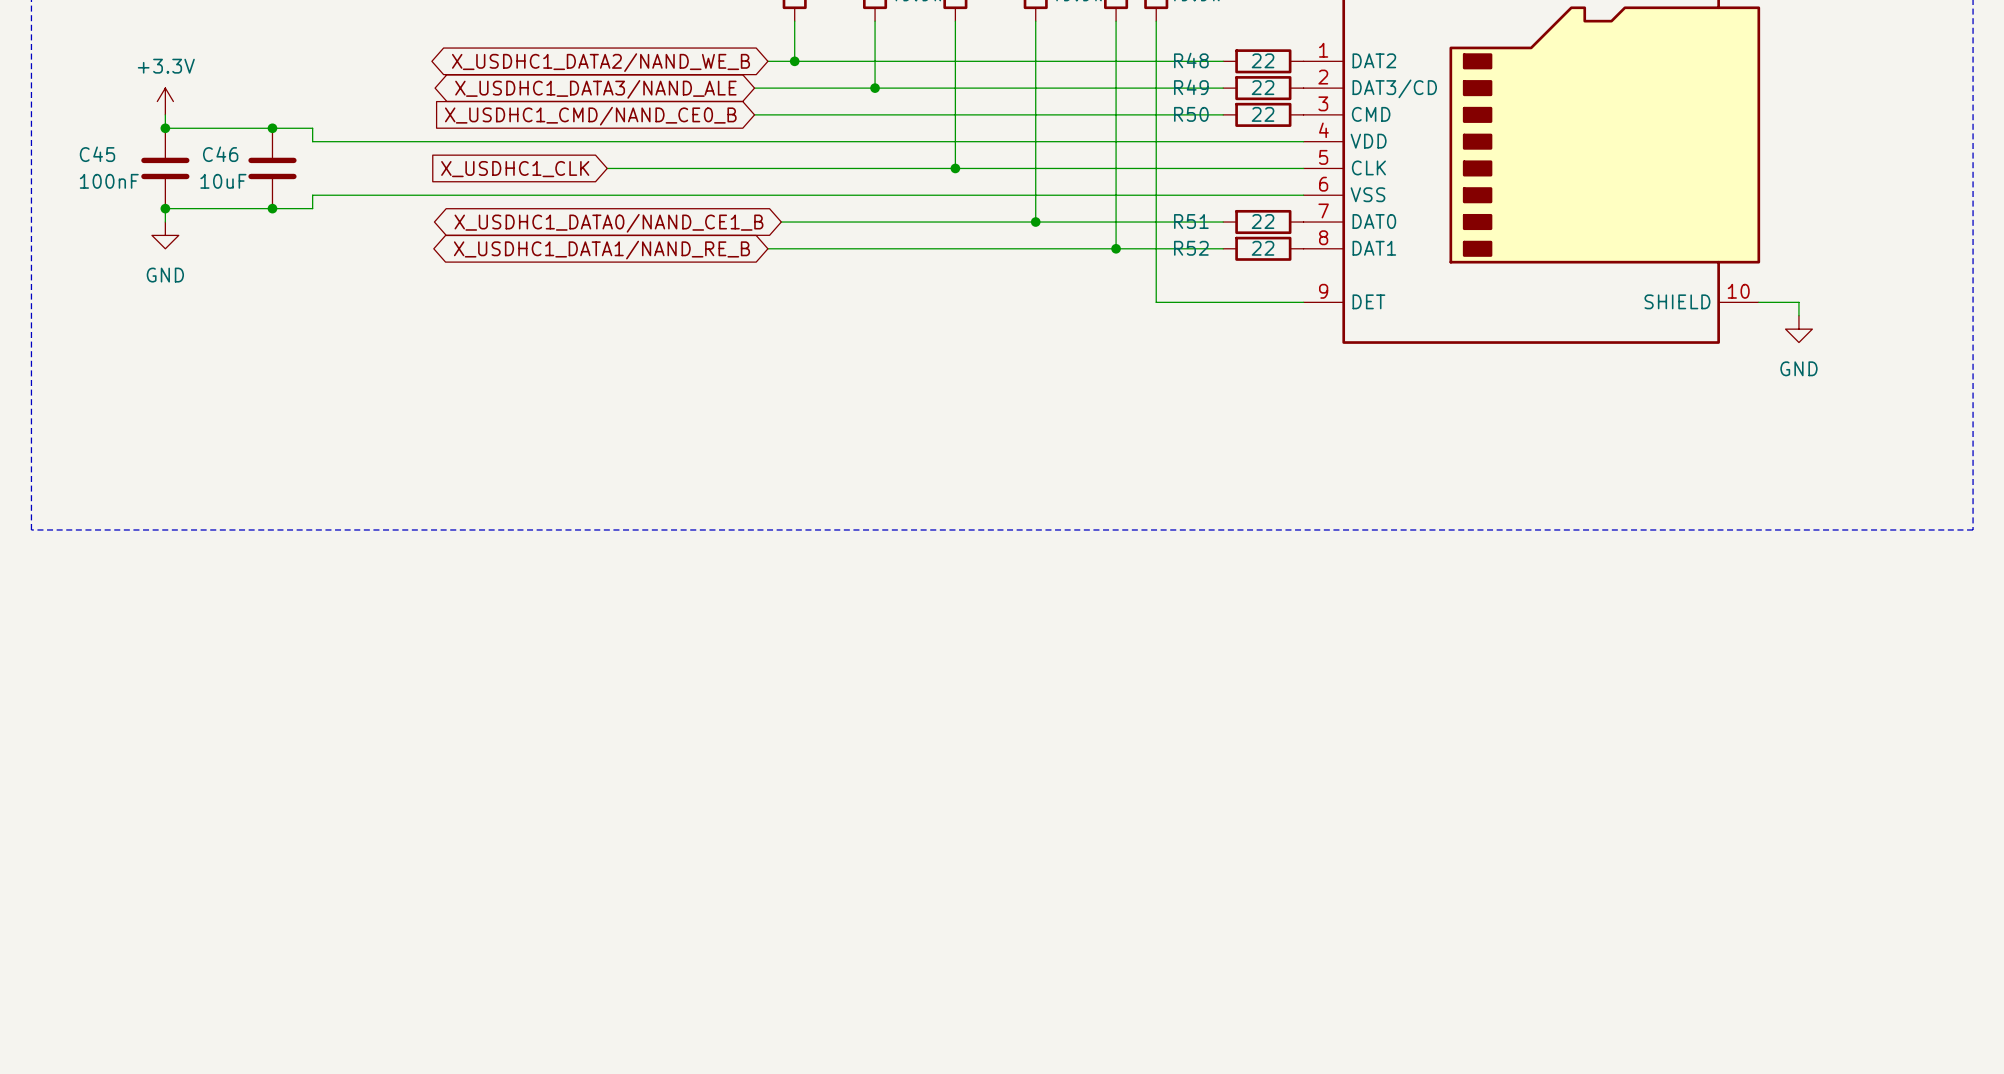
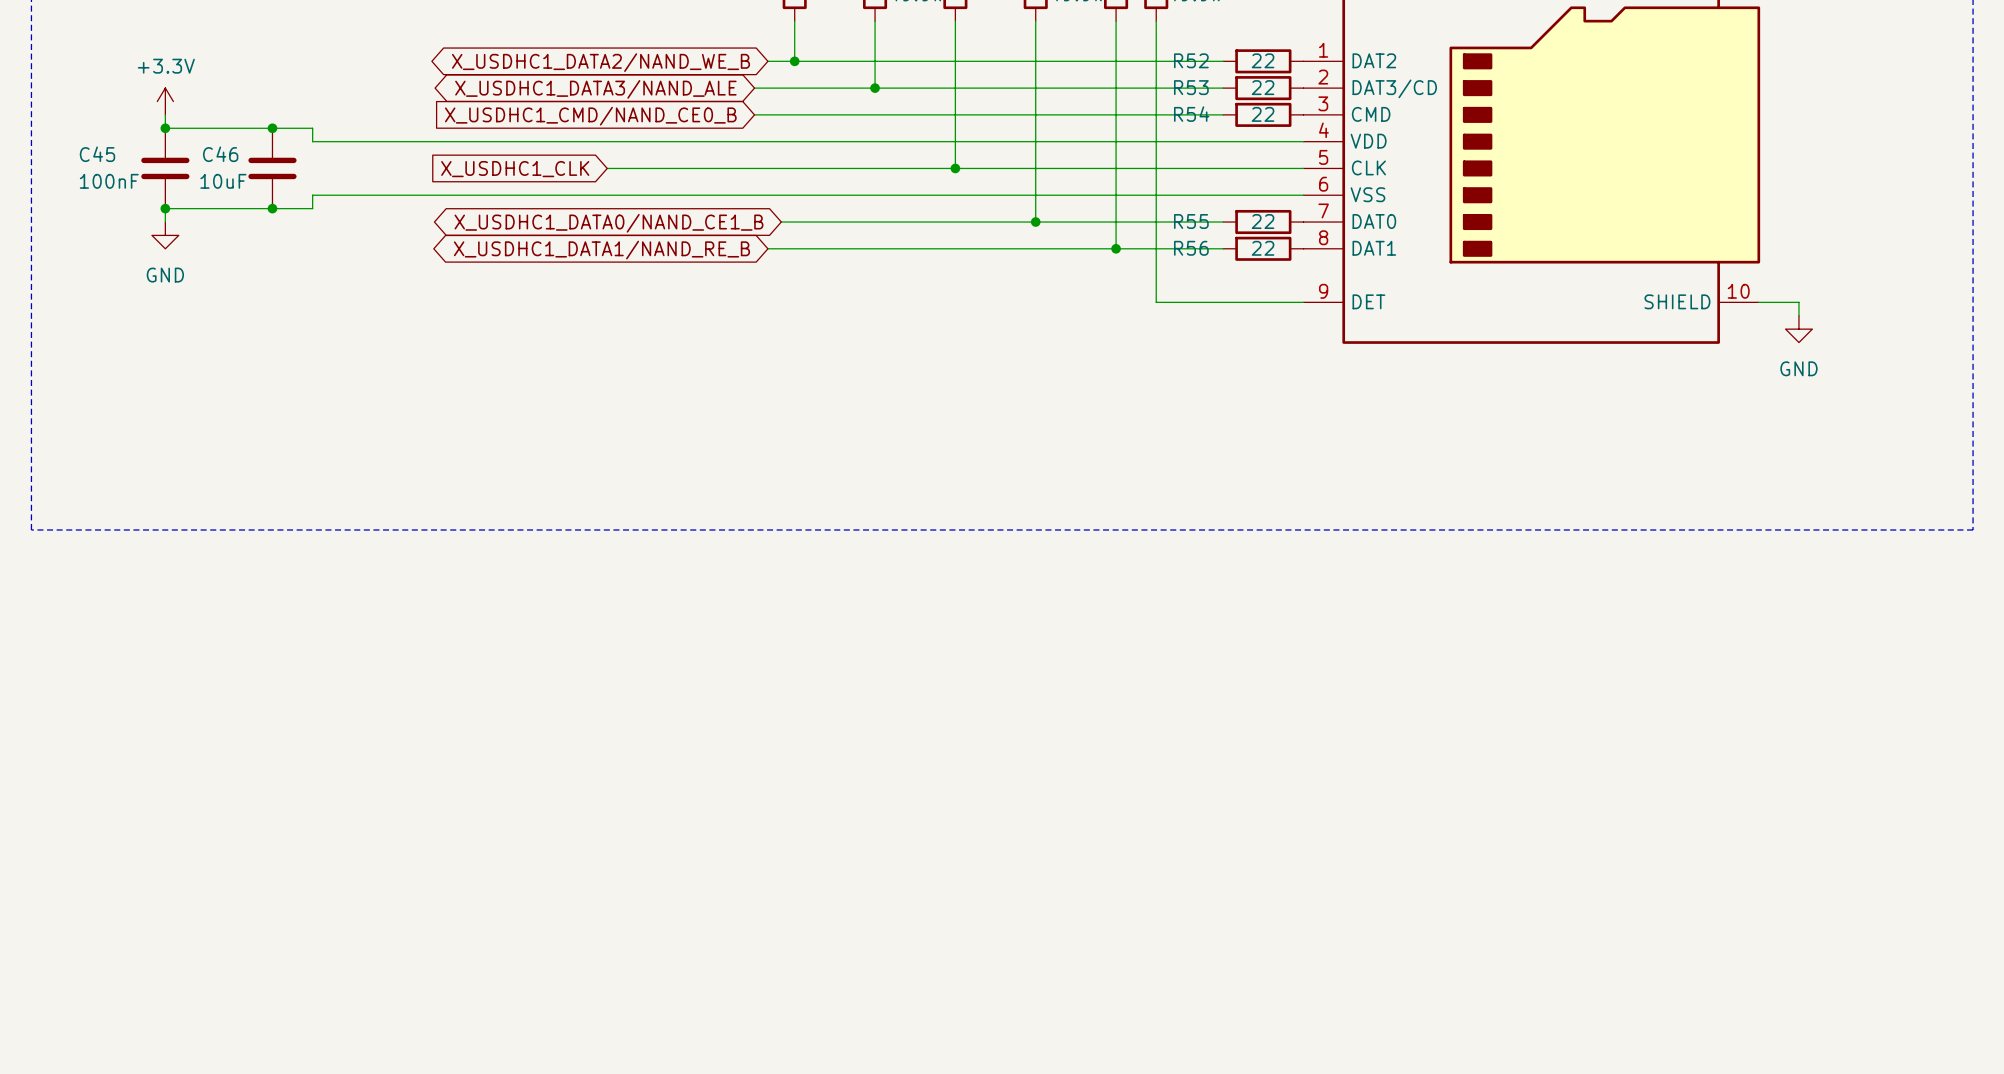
R48 name: R48 (1191, 60) -> R52 (1191, 60)
R49 name: R49 (1191, 87) -> R53 (1191, 87)
R50 name: R50 (1191, 114) -> R54 (1191, 114)
R51 name: R51 (1191, 221) -> R55 (1191, 221)
R52 name: R52 (1191, 248) -> R56 (1191, 248)

